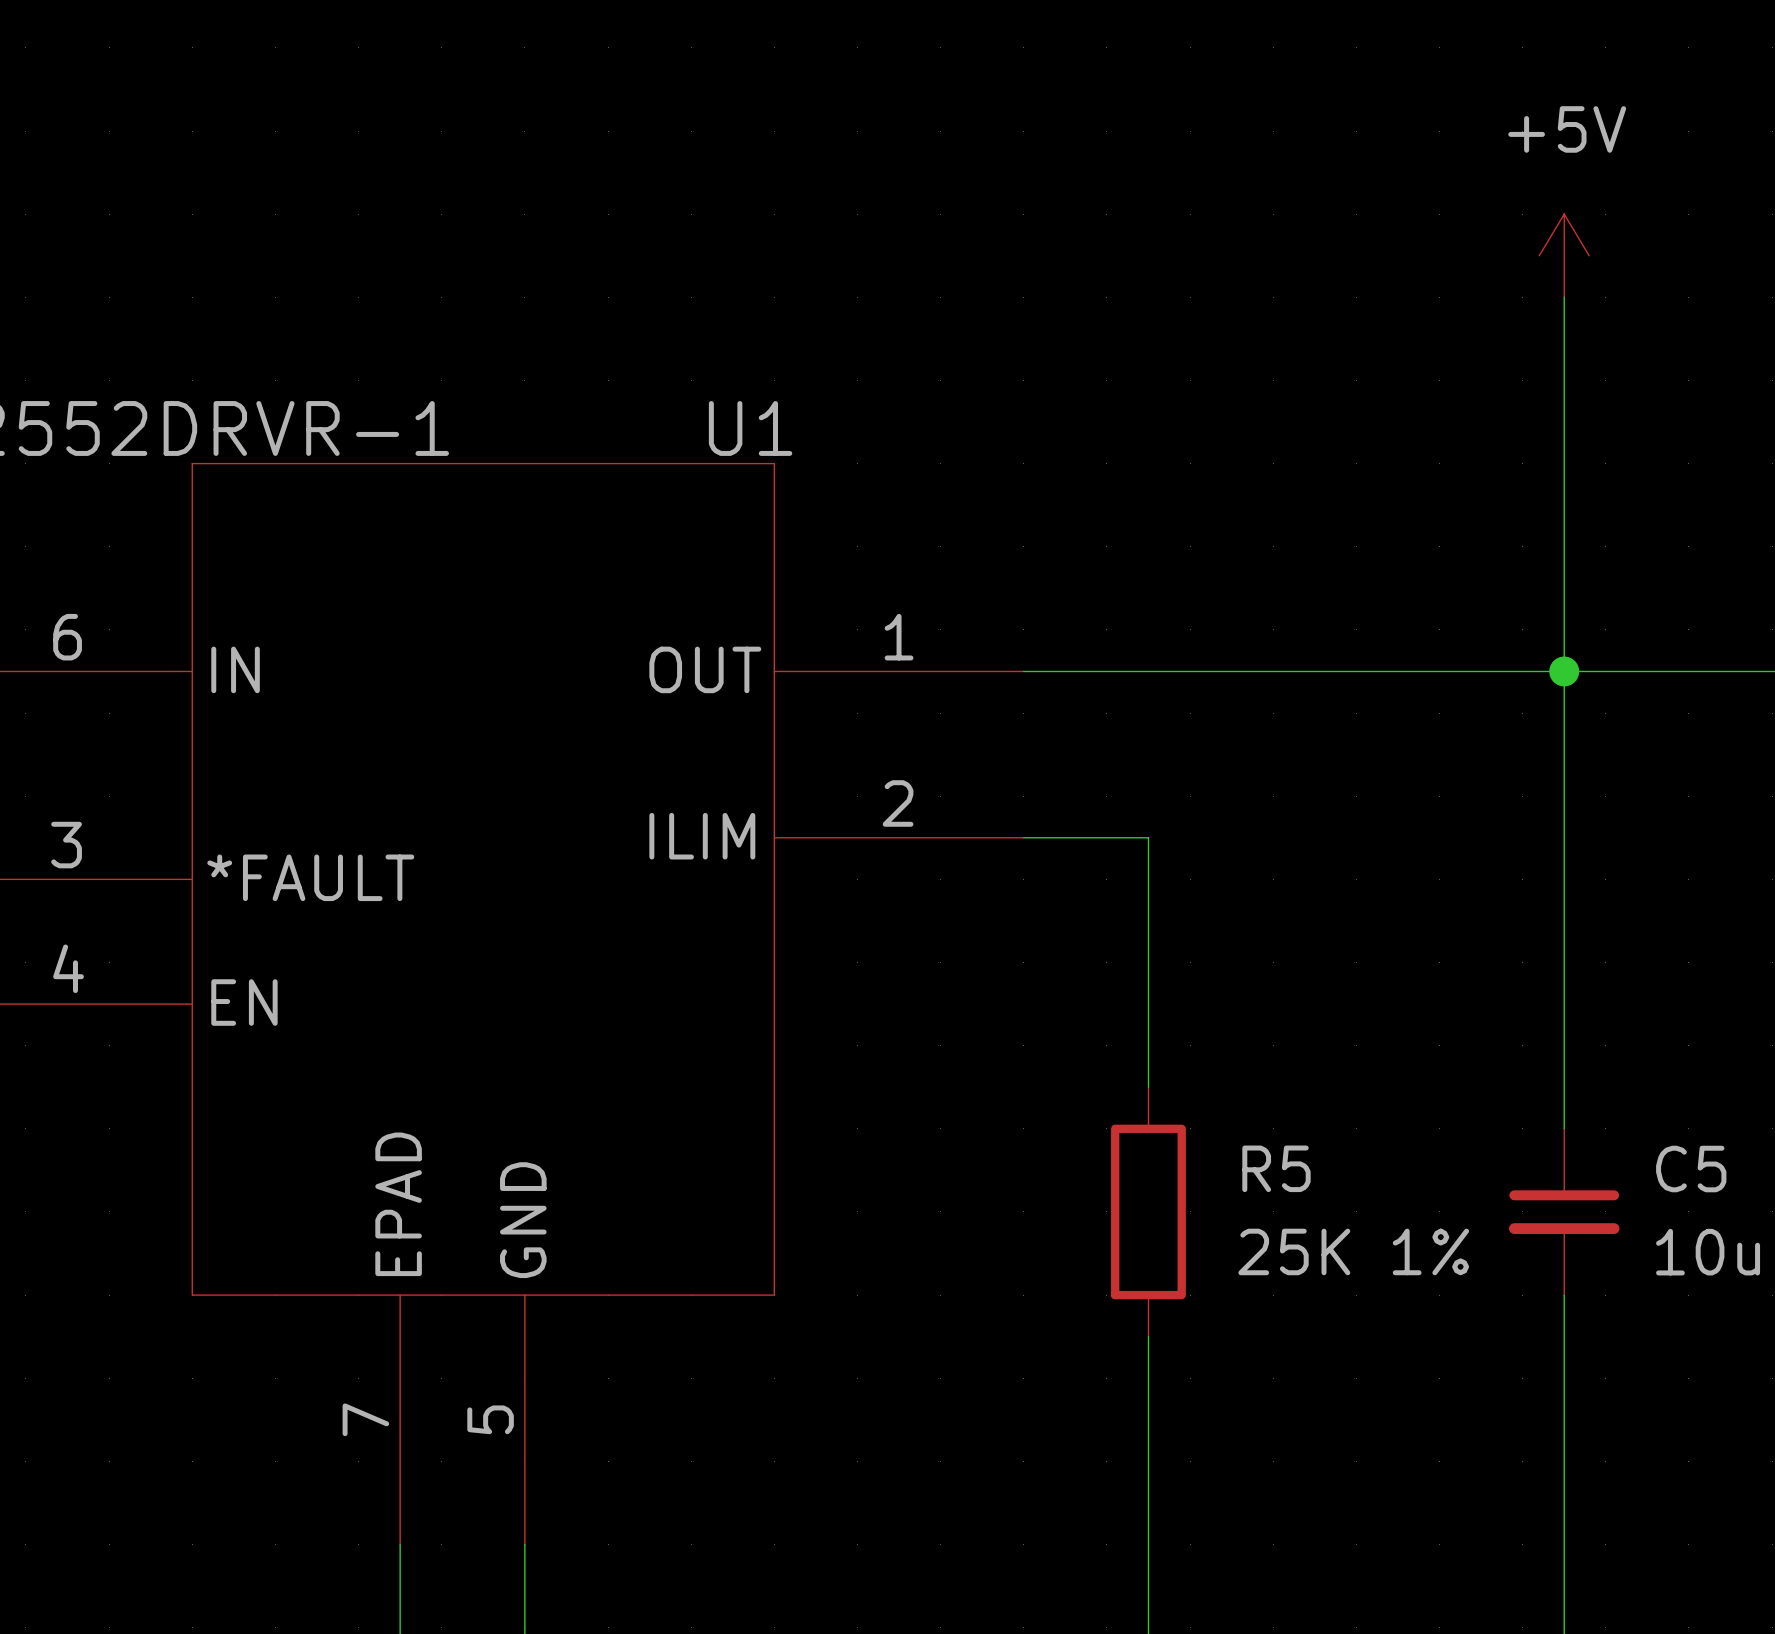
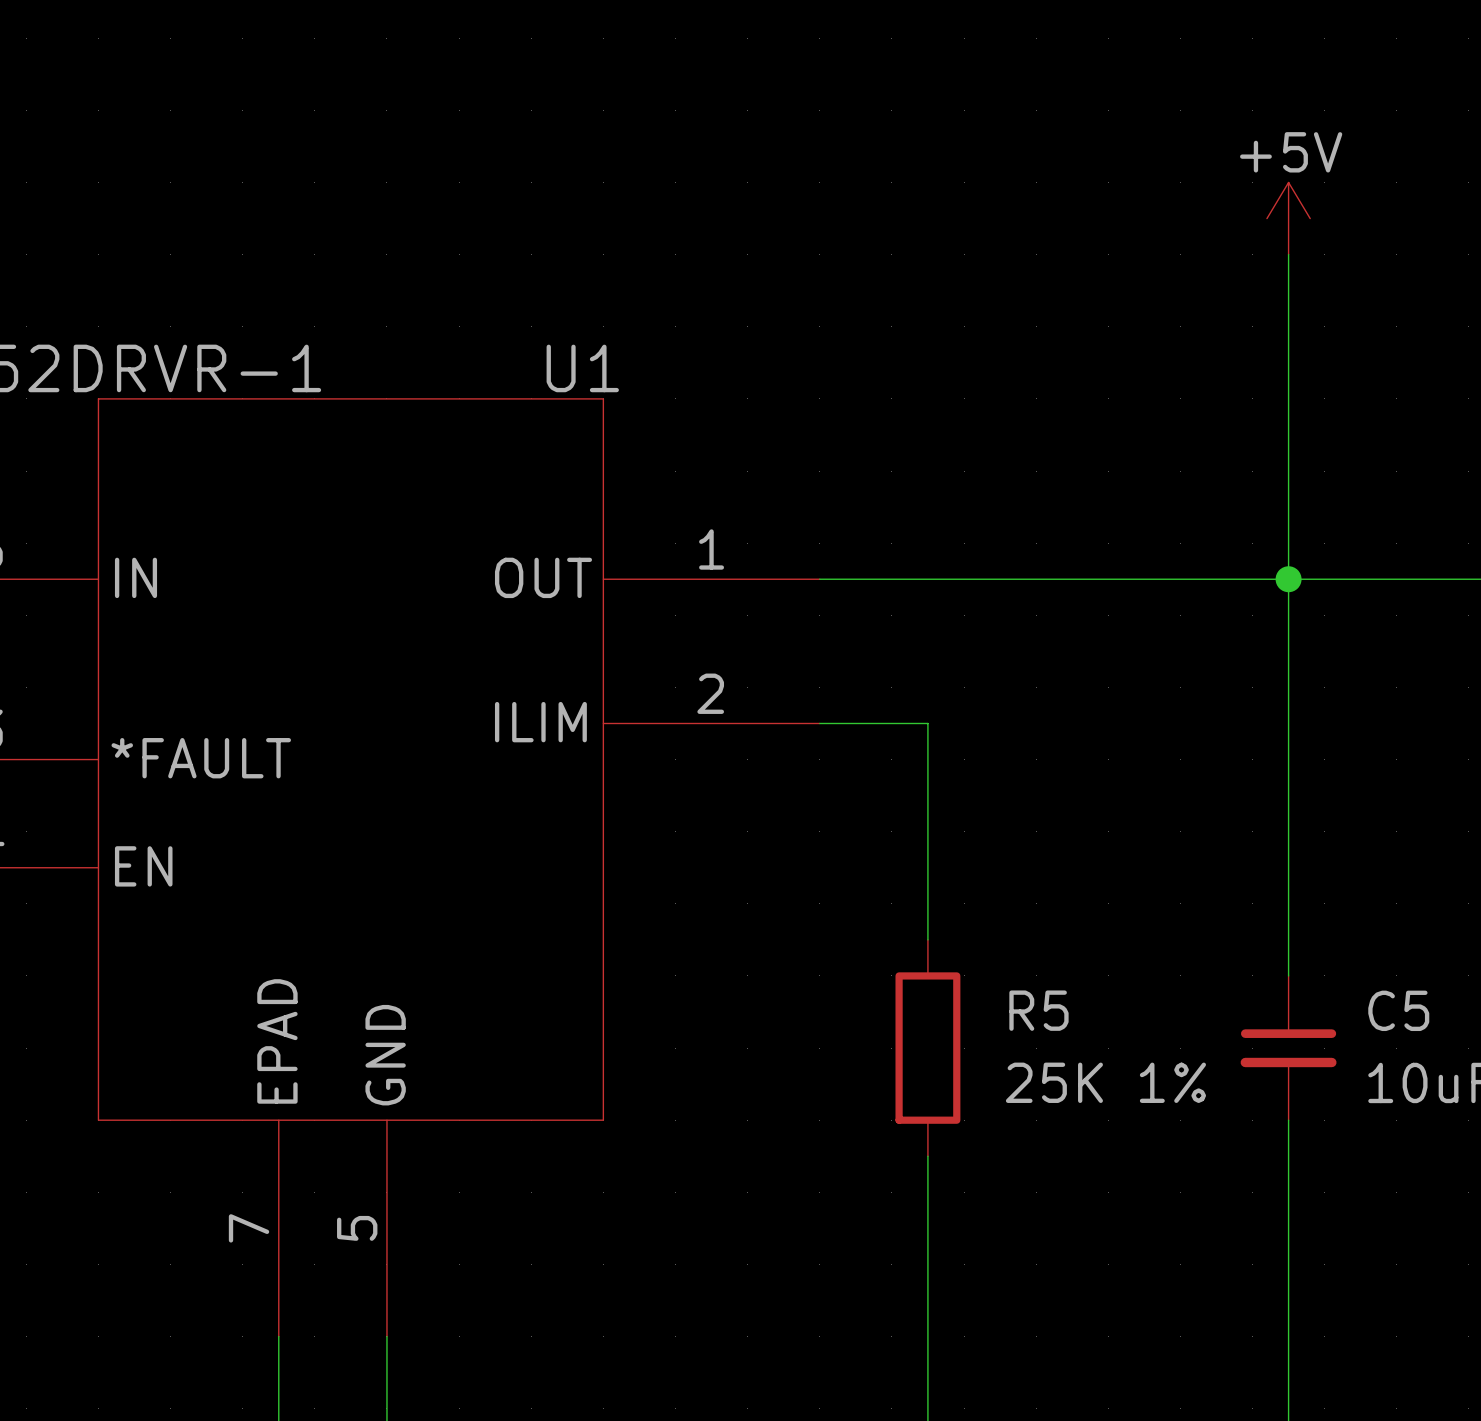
power symbol text position: +5V (1567, 129) -> +5V (1291, 152)

